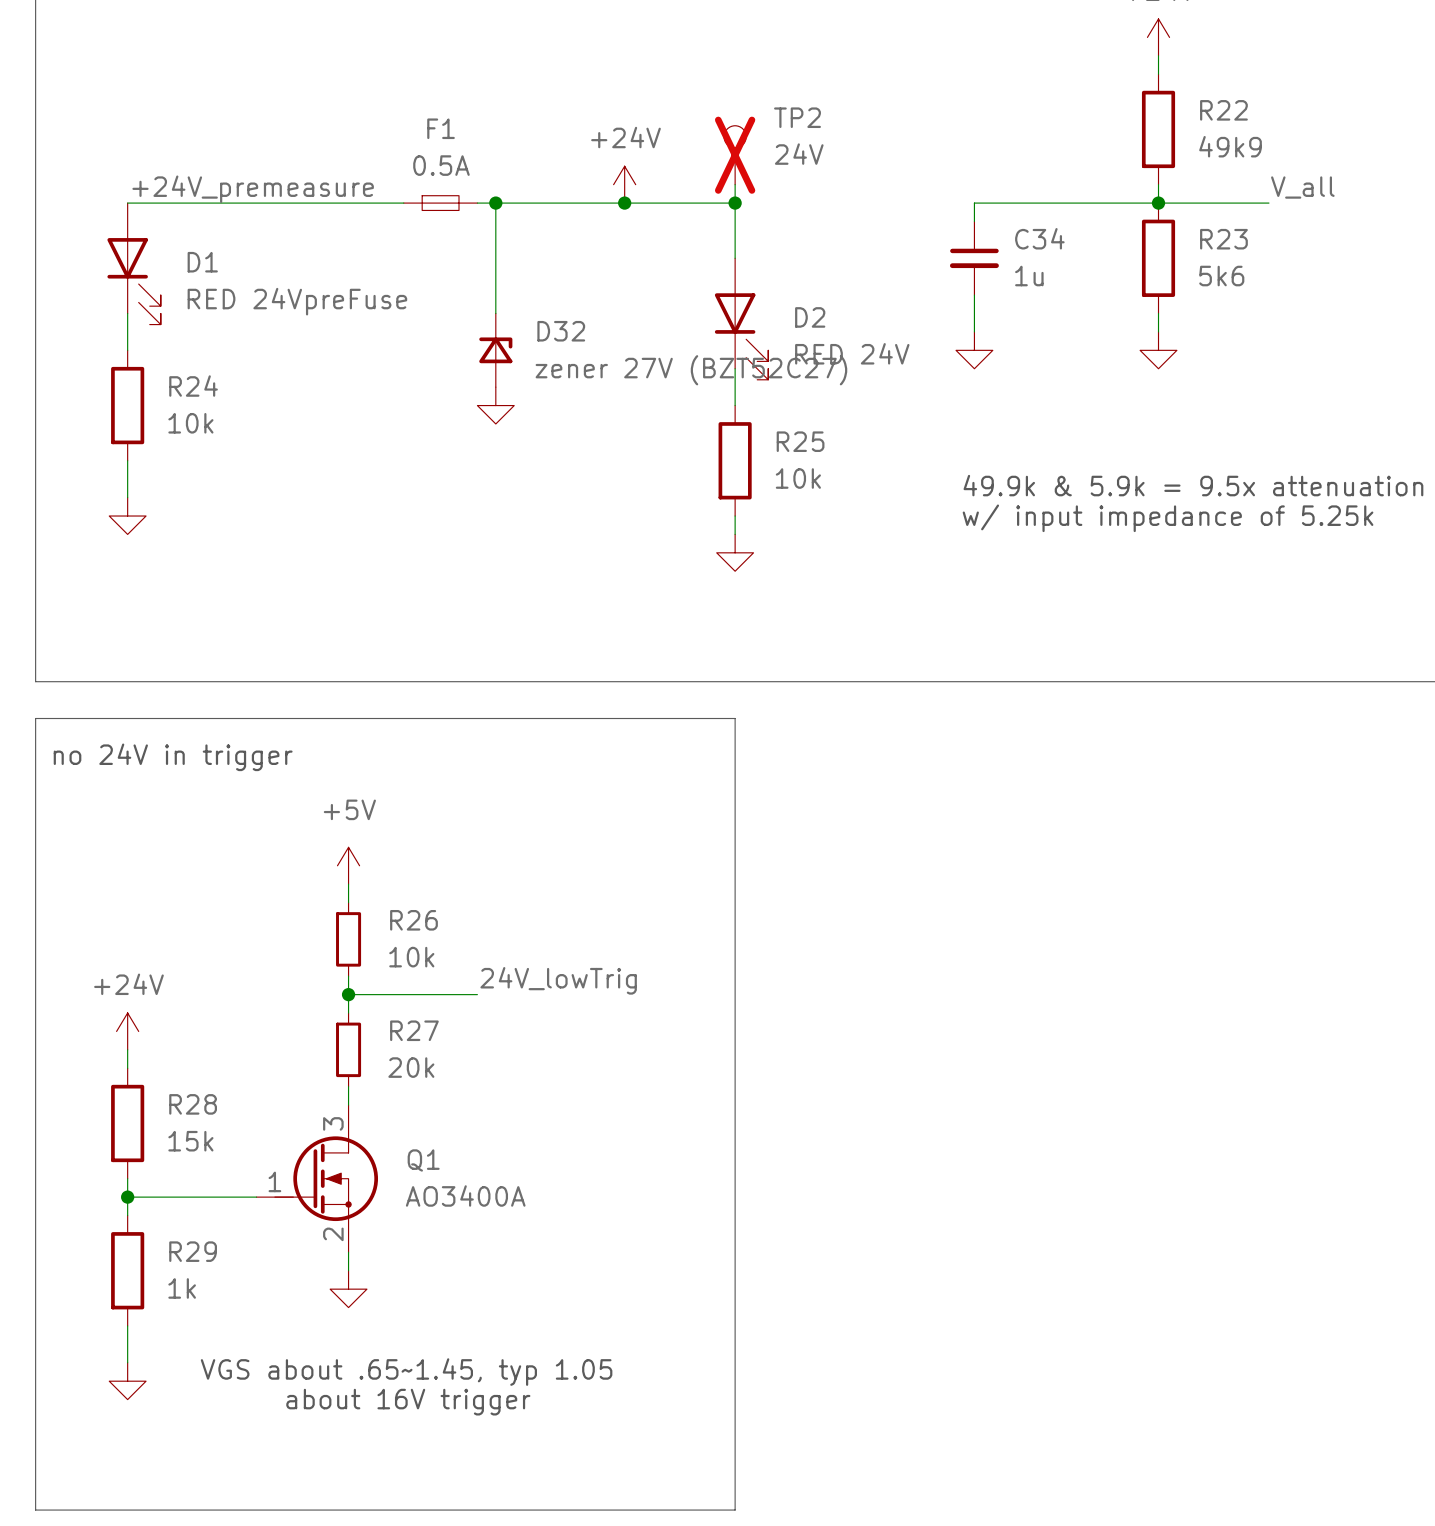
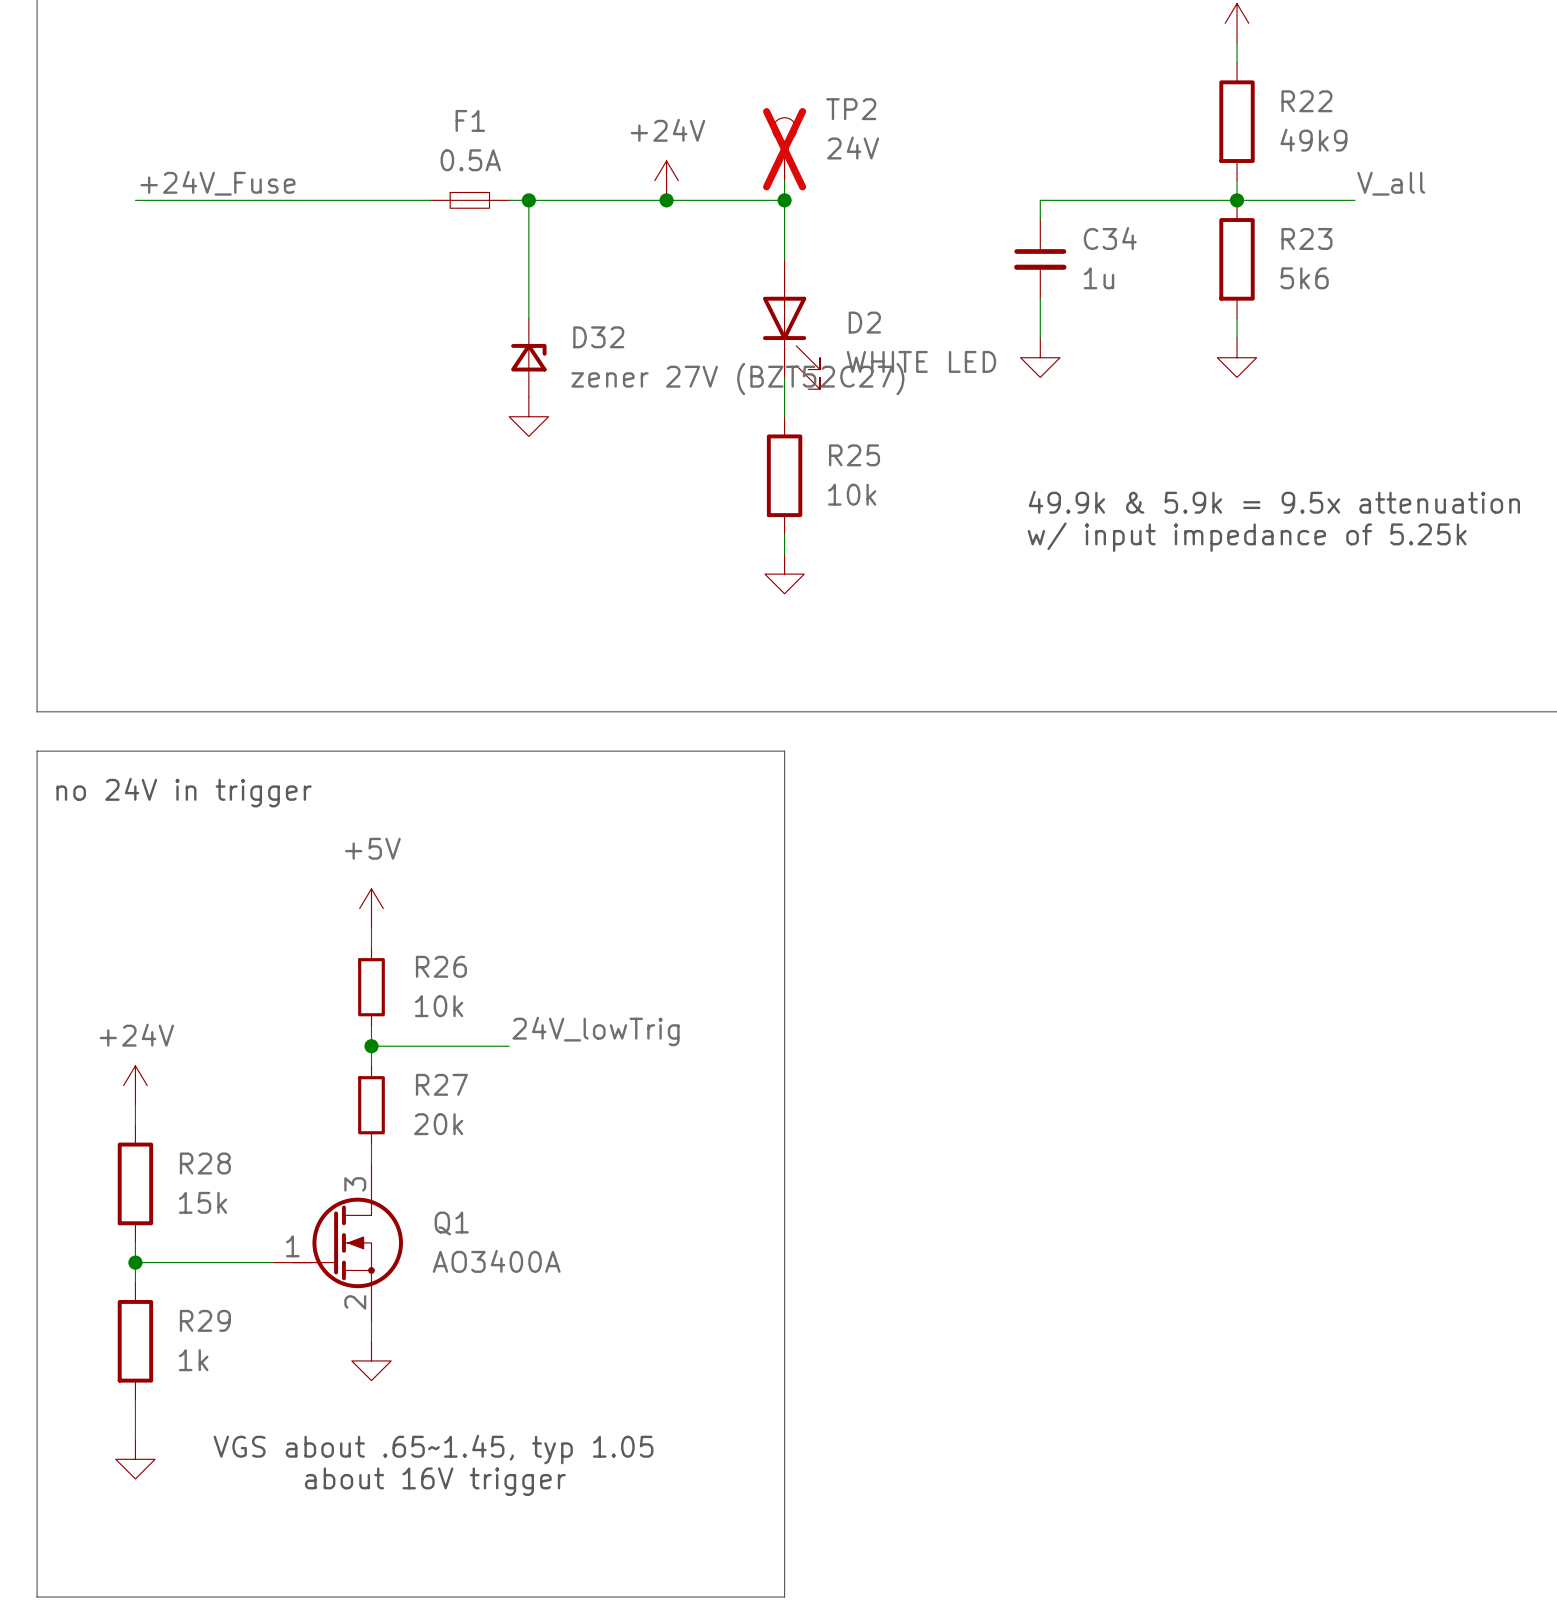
label: +24V_premeasure (253, 189) -> +24V_Fuse (218, 183)
D1: RED 24VpreFuse (134, 263) -> none
wire: (127, 313) (127, 350) -> none
D2 value: RED 24V (852, 353) -> WHITE LED (921, 361)
R24: 10k (127, 405) -> none
wire: (127, 460) (127, 497) -> none
power symbol: (127, 516) -> none

